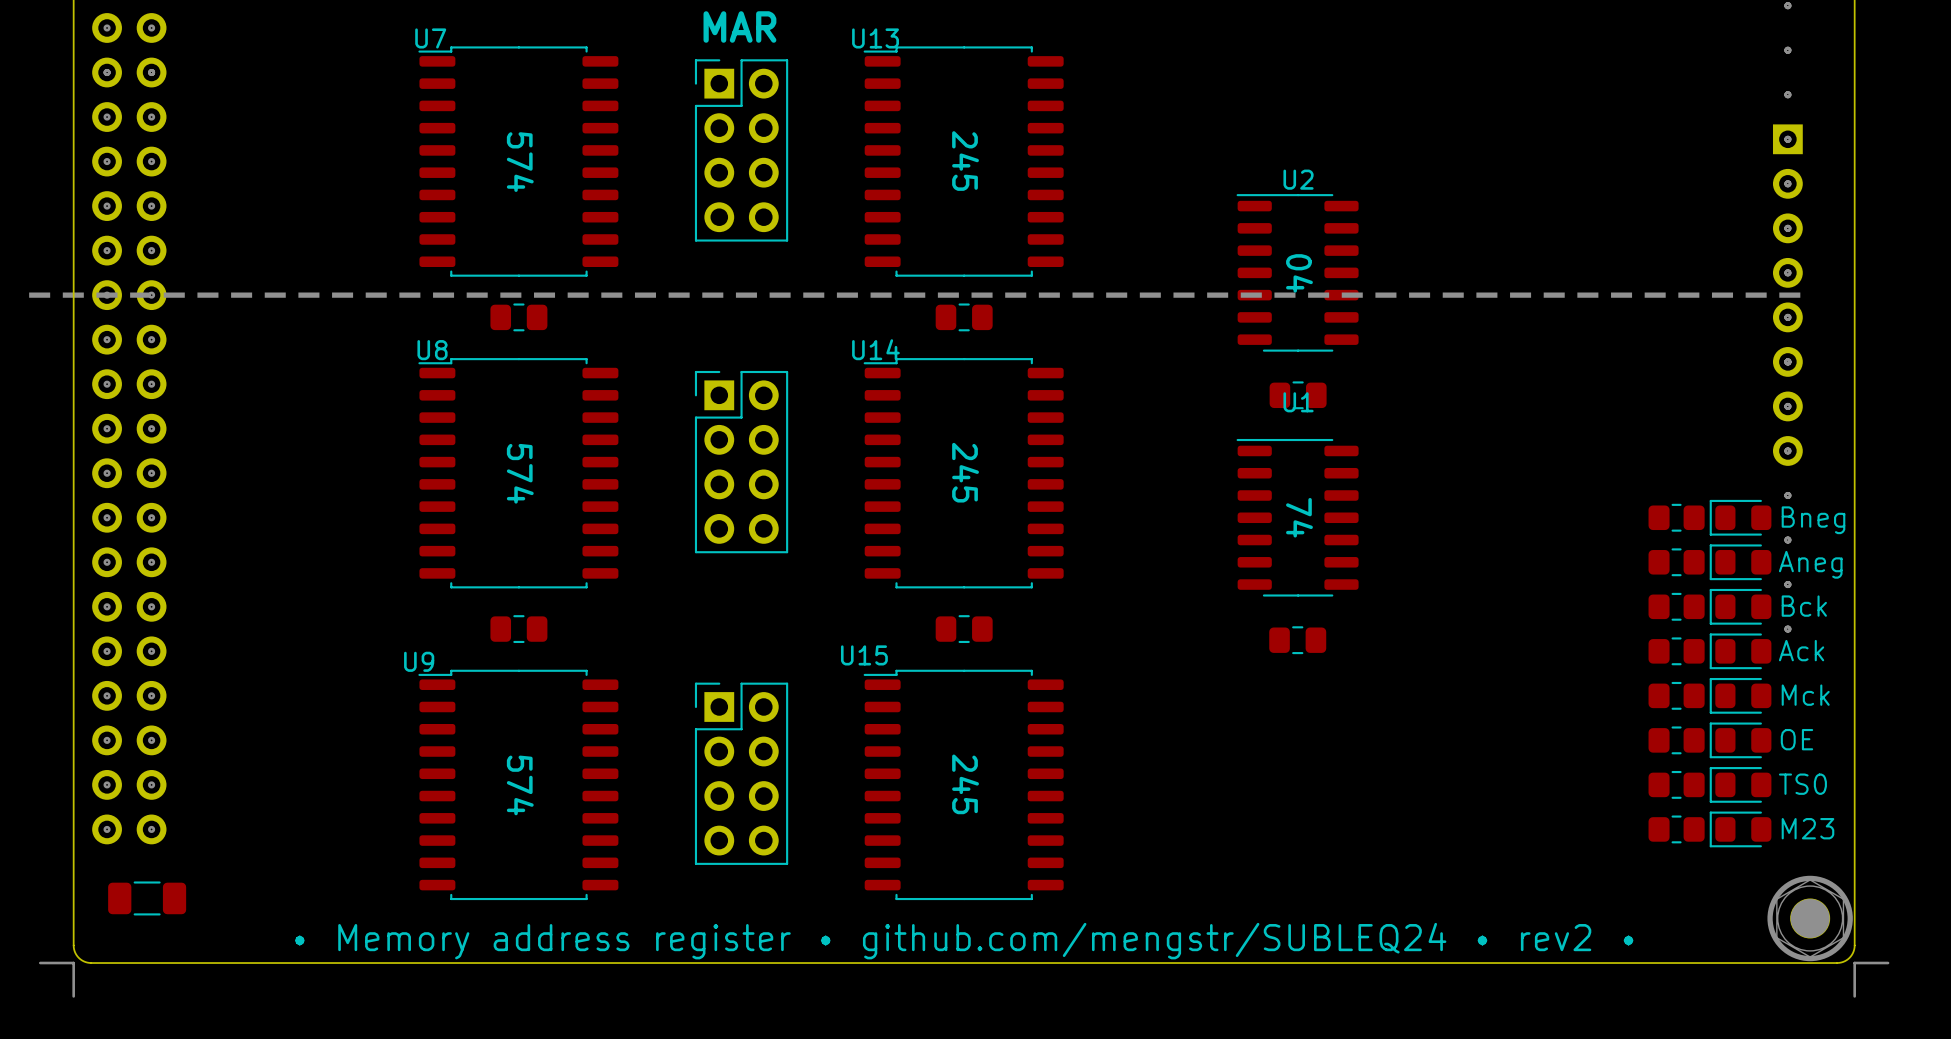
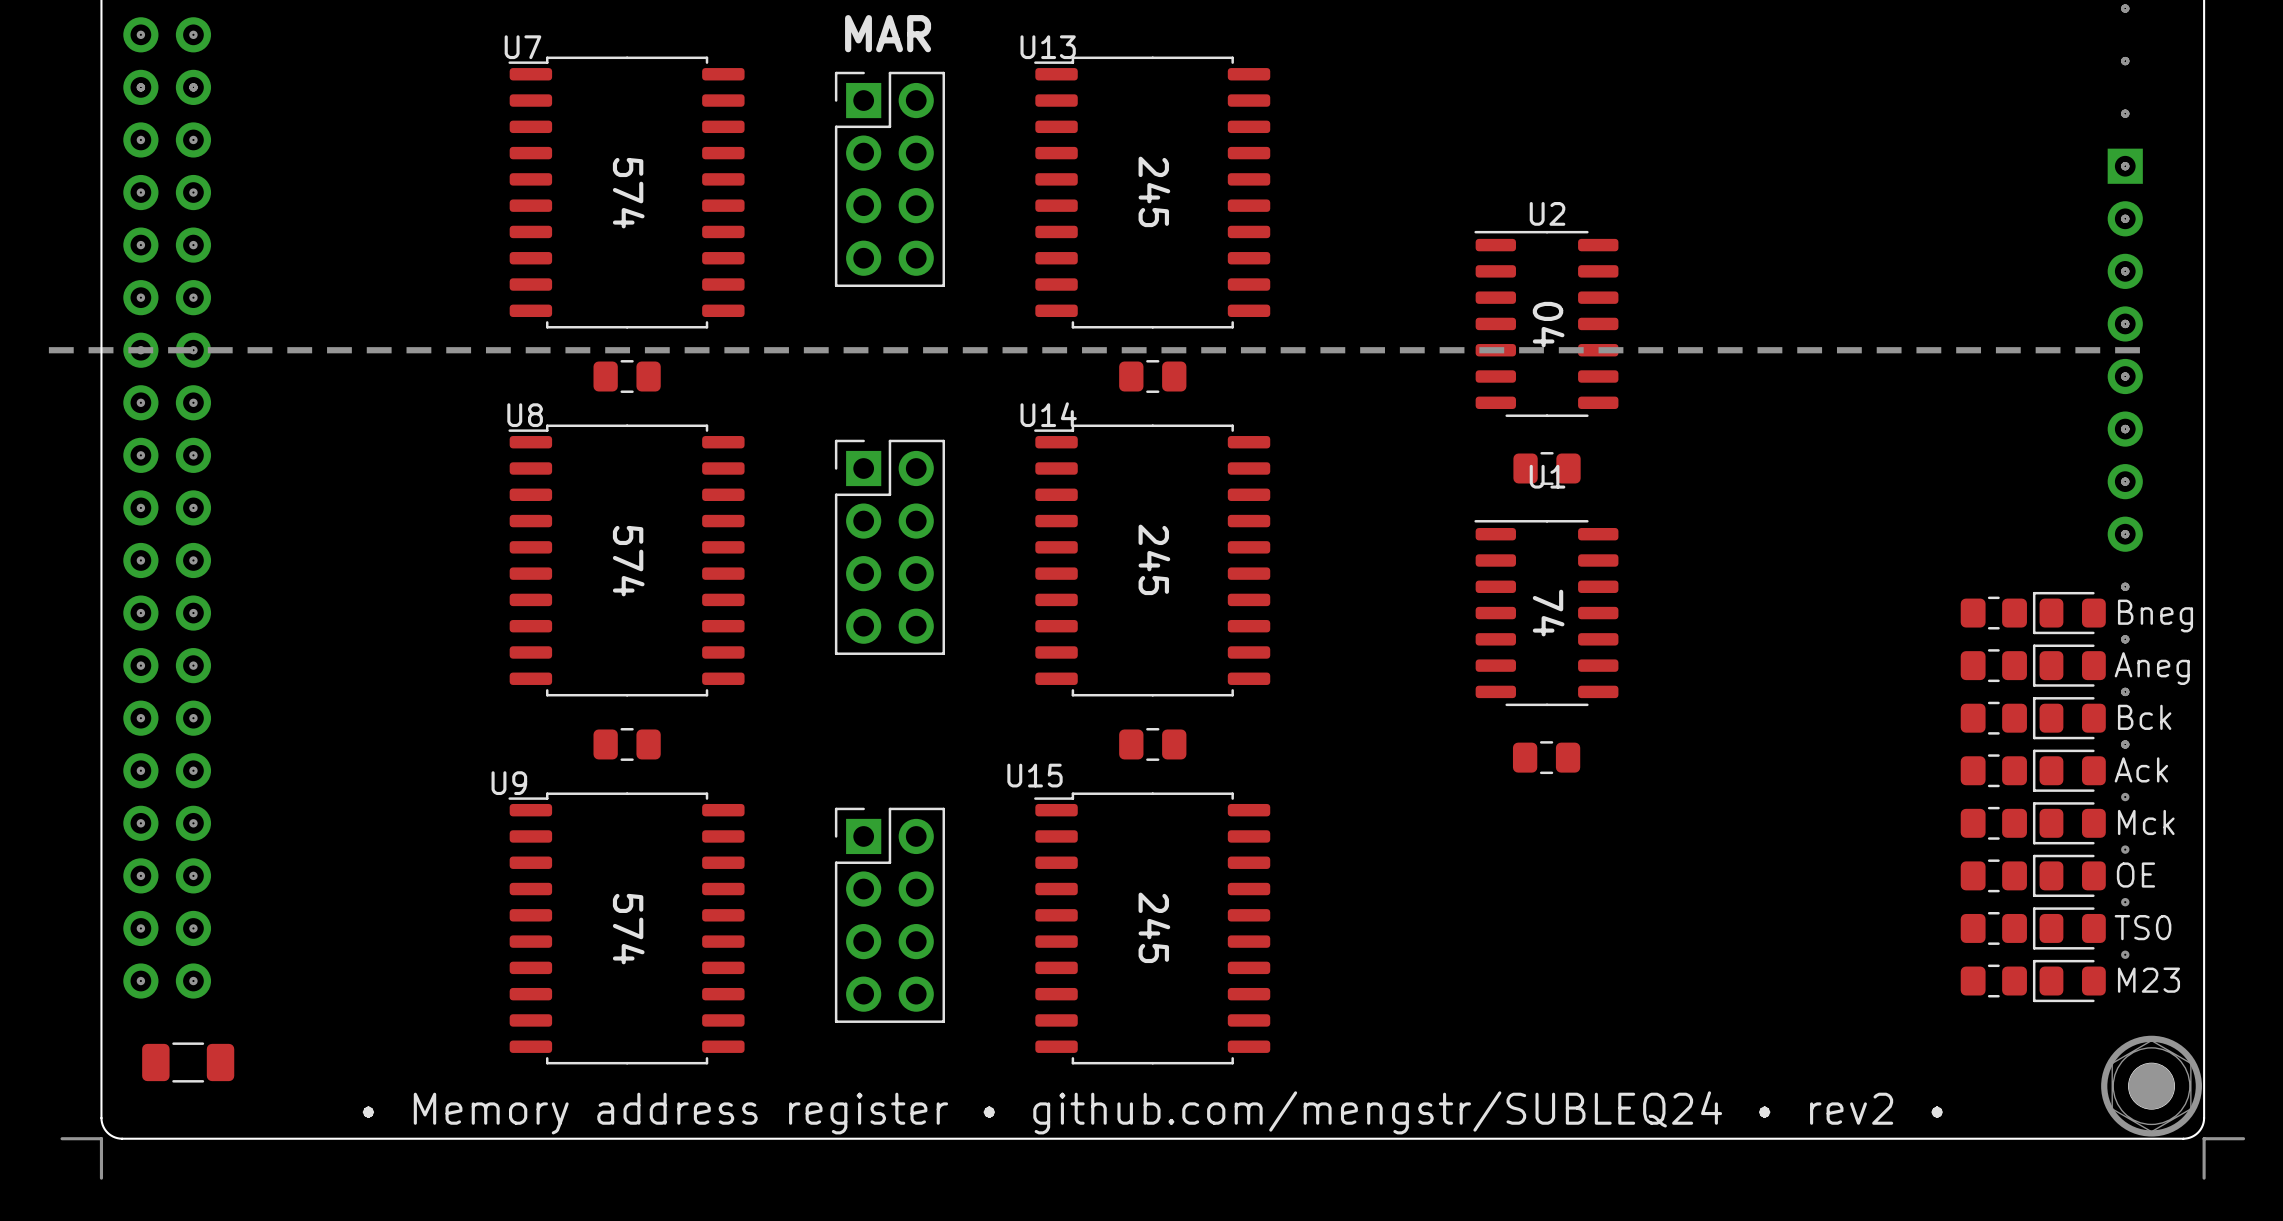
drawing: none -> [2121, 792, 2130, 802]
drawing: none -> [2121, 845, 2130, 854]
drawing: none -> [2121, 897, 2130, 907]
drawing: none -> [2121, 950, 2130, 959]

